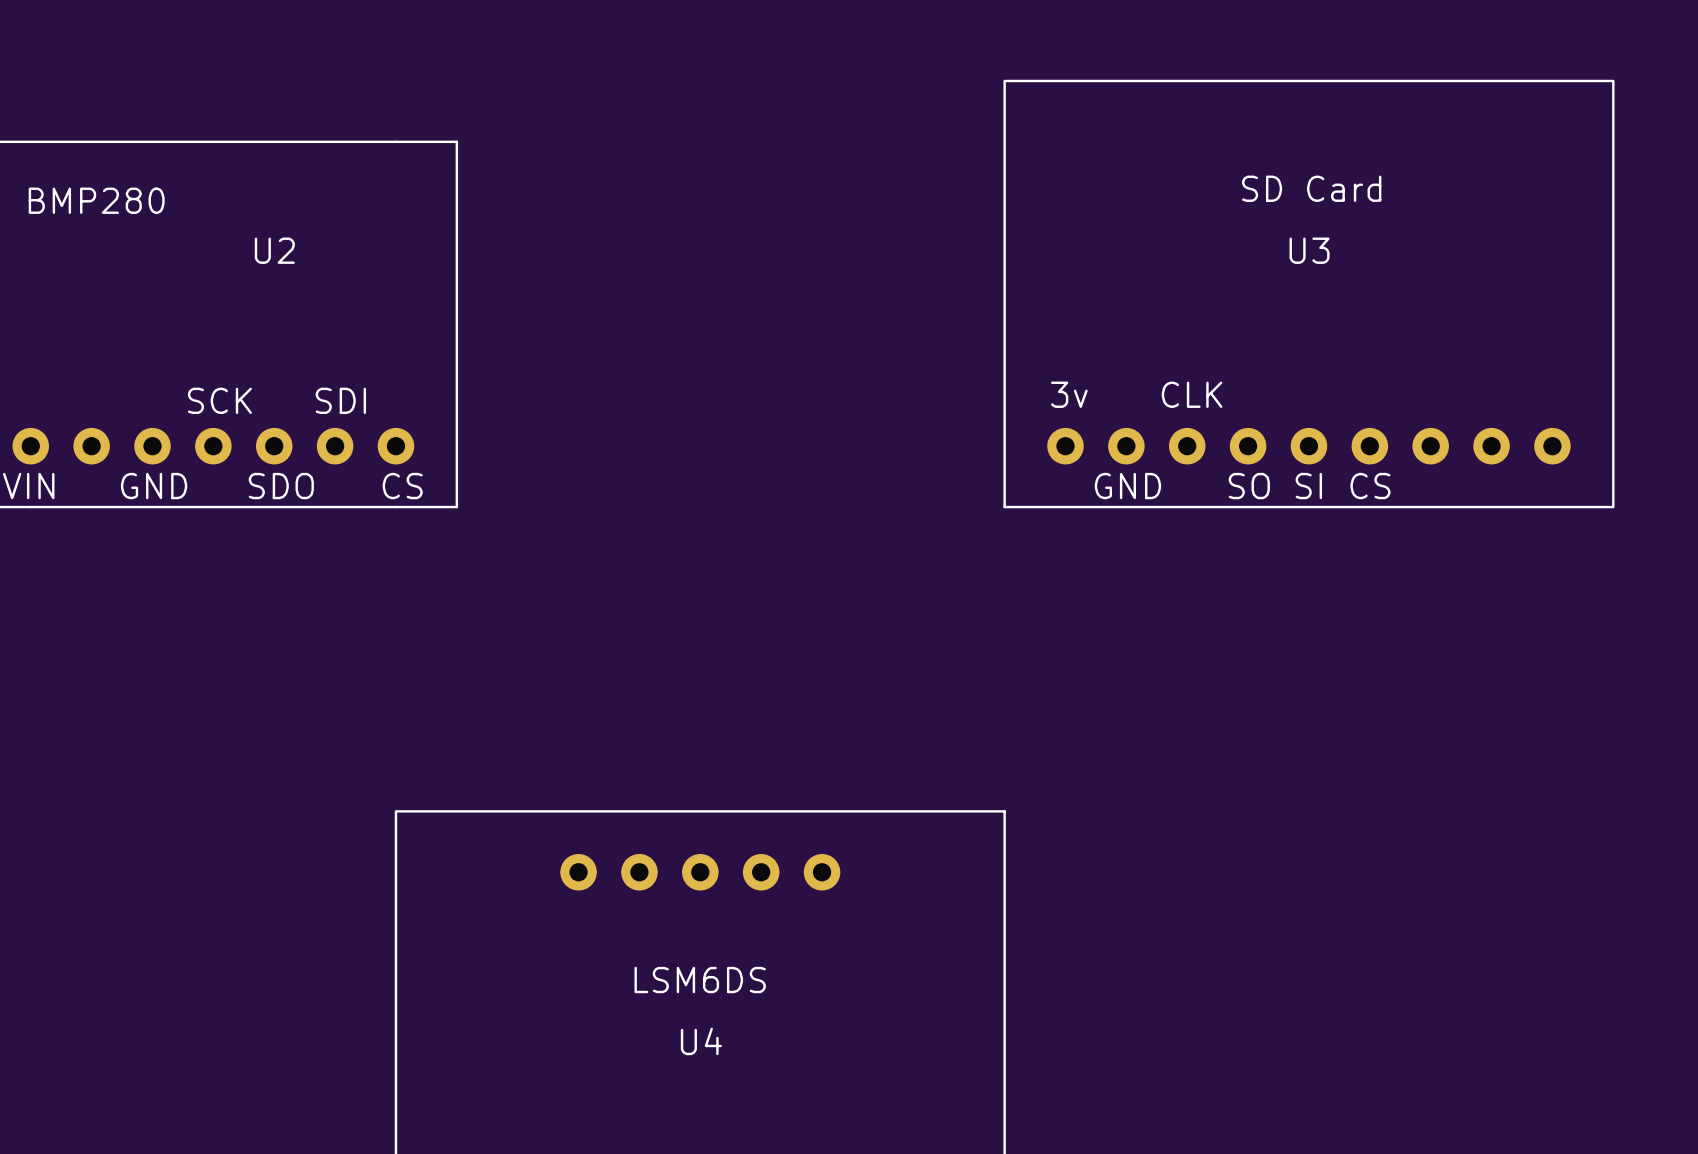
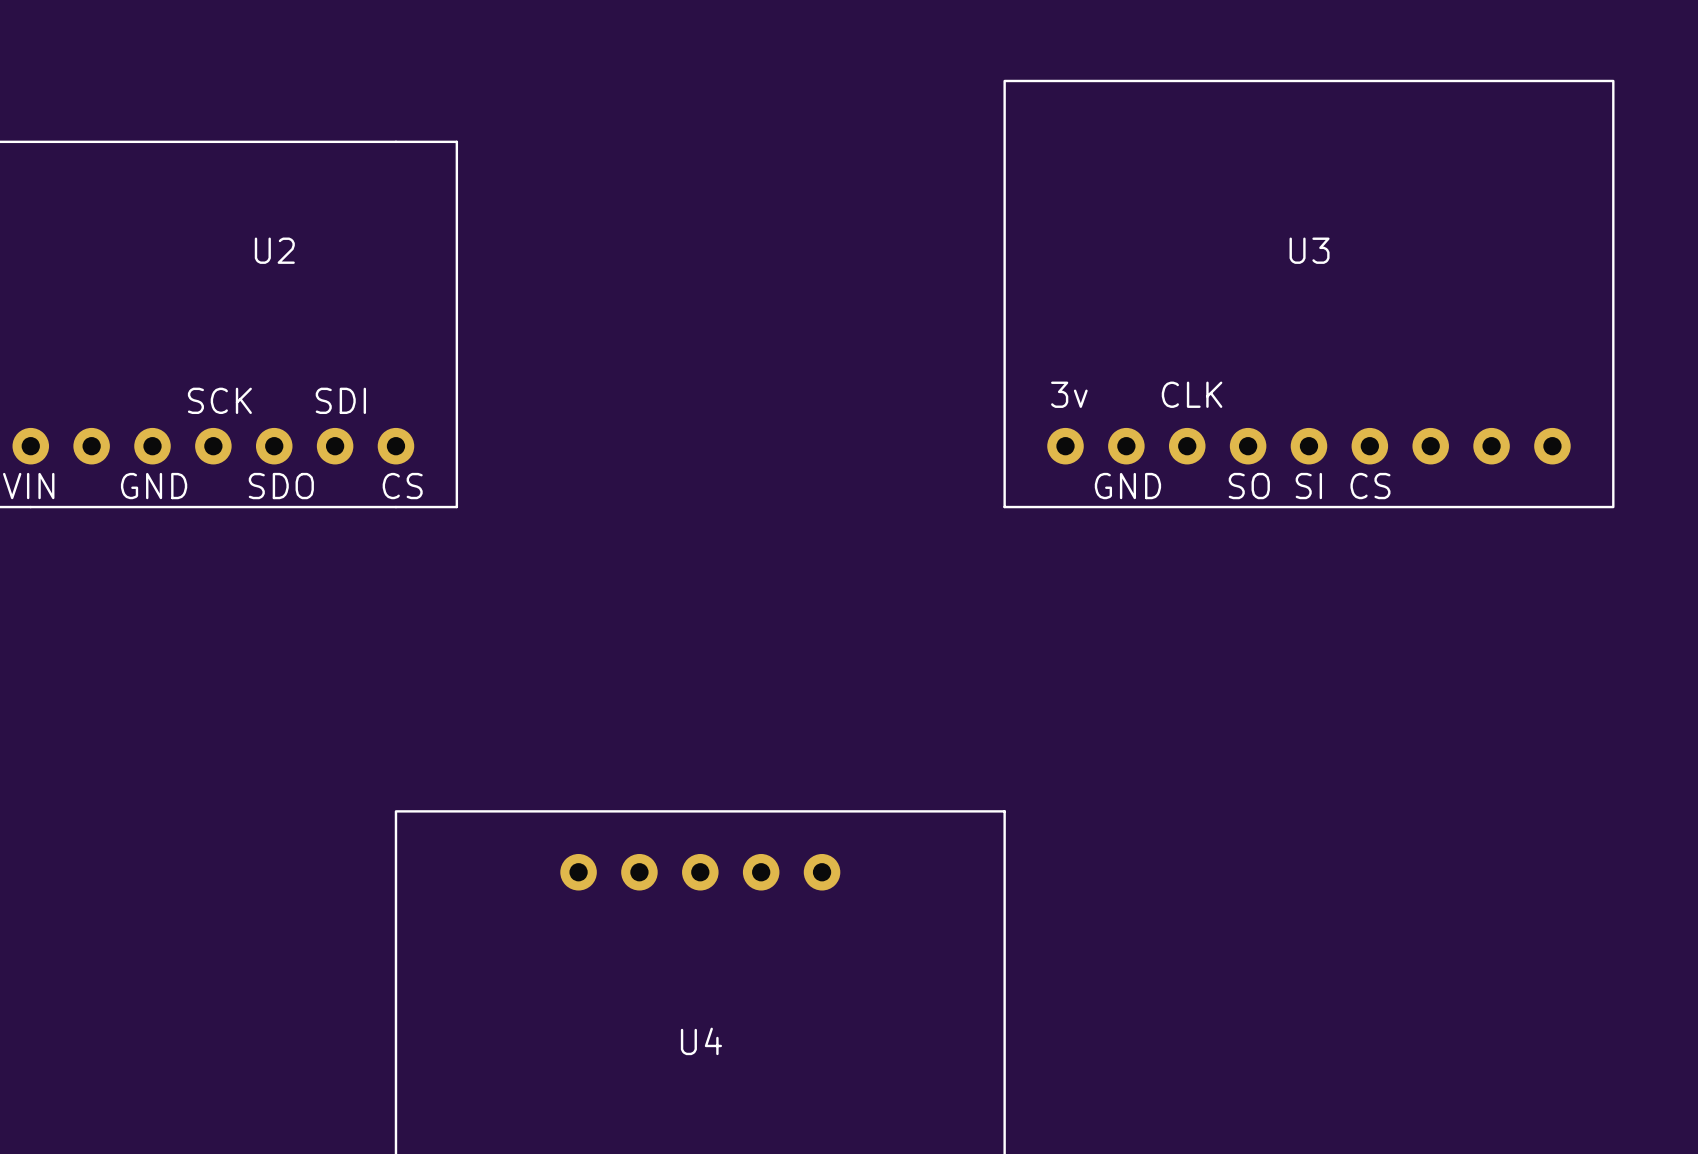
U3 text: SD Card (1311, 188) -> none
U2 text: BMP280 (96, 200) -> none
U4 text: LSM6DS (700, 980) -> none

